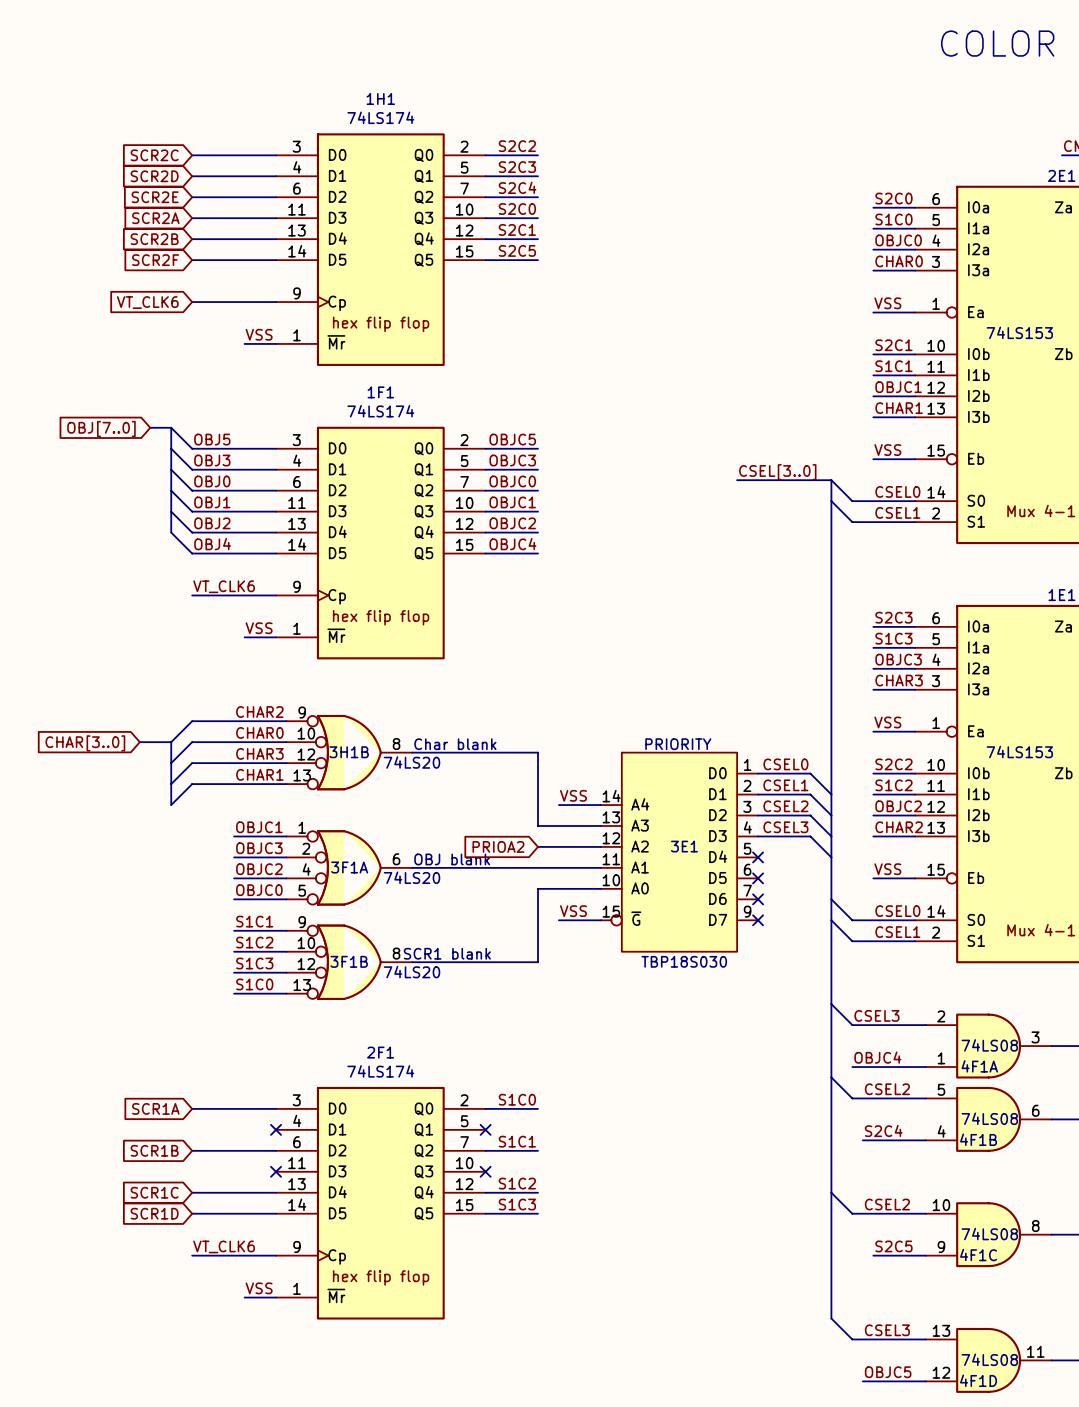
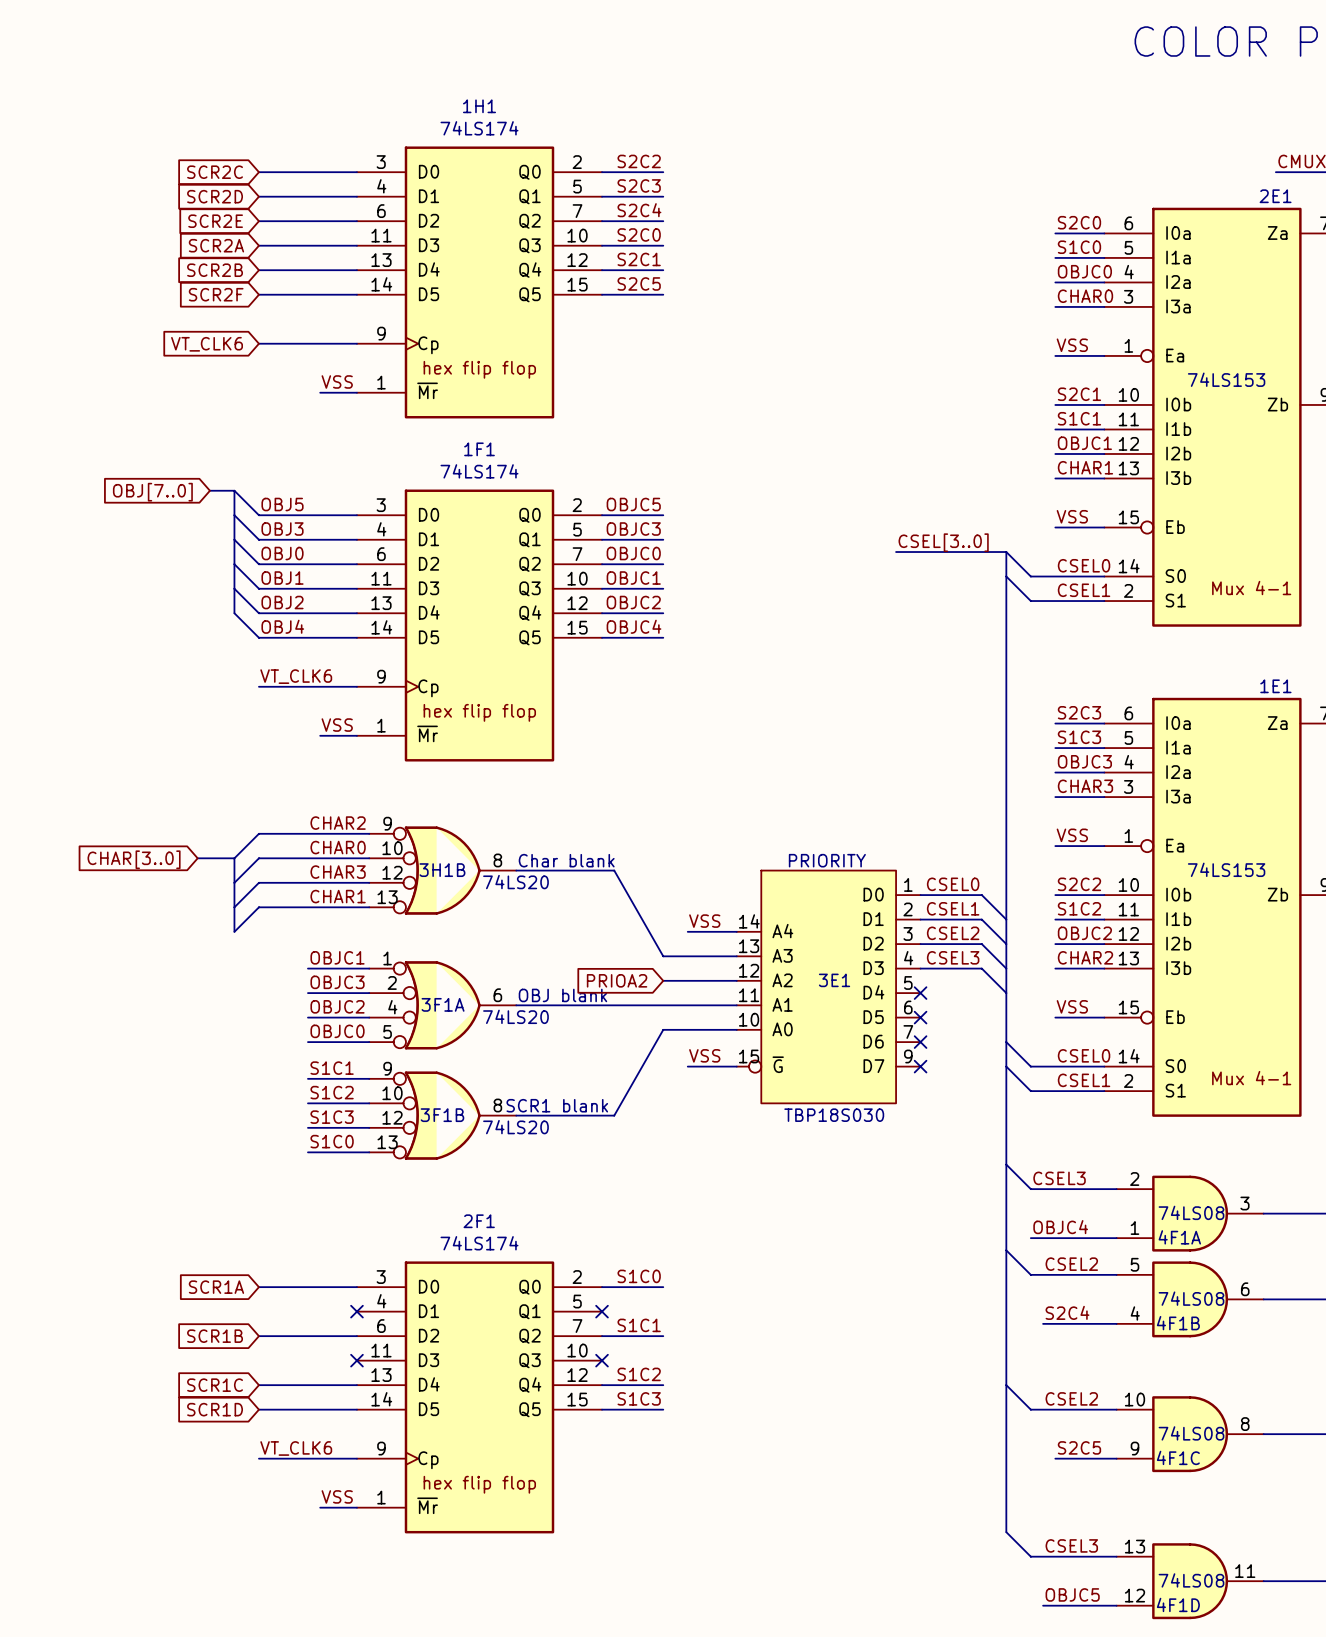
wire: (496, 752) (538, 752) (538, 825) -> (614, 870) (663, 956)
wire: (538, 888) (538, 962) (496, 962) -> (663, 1029) (614, 1115)

